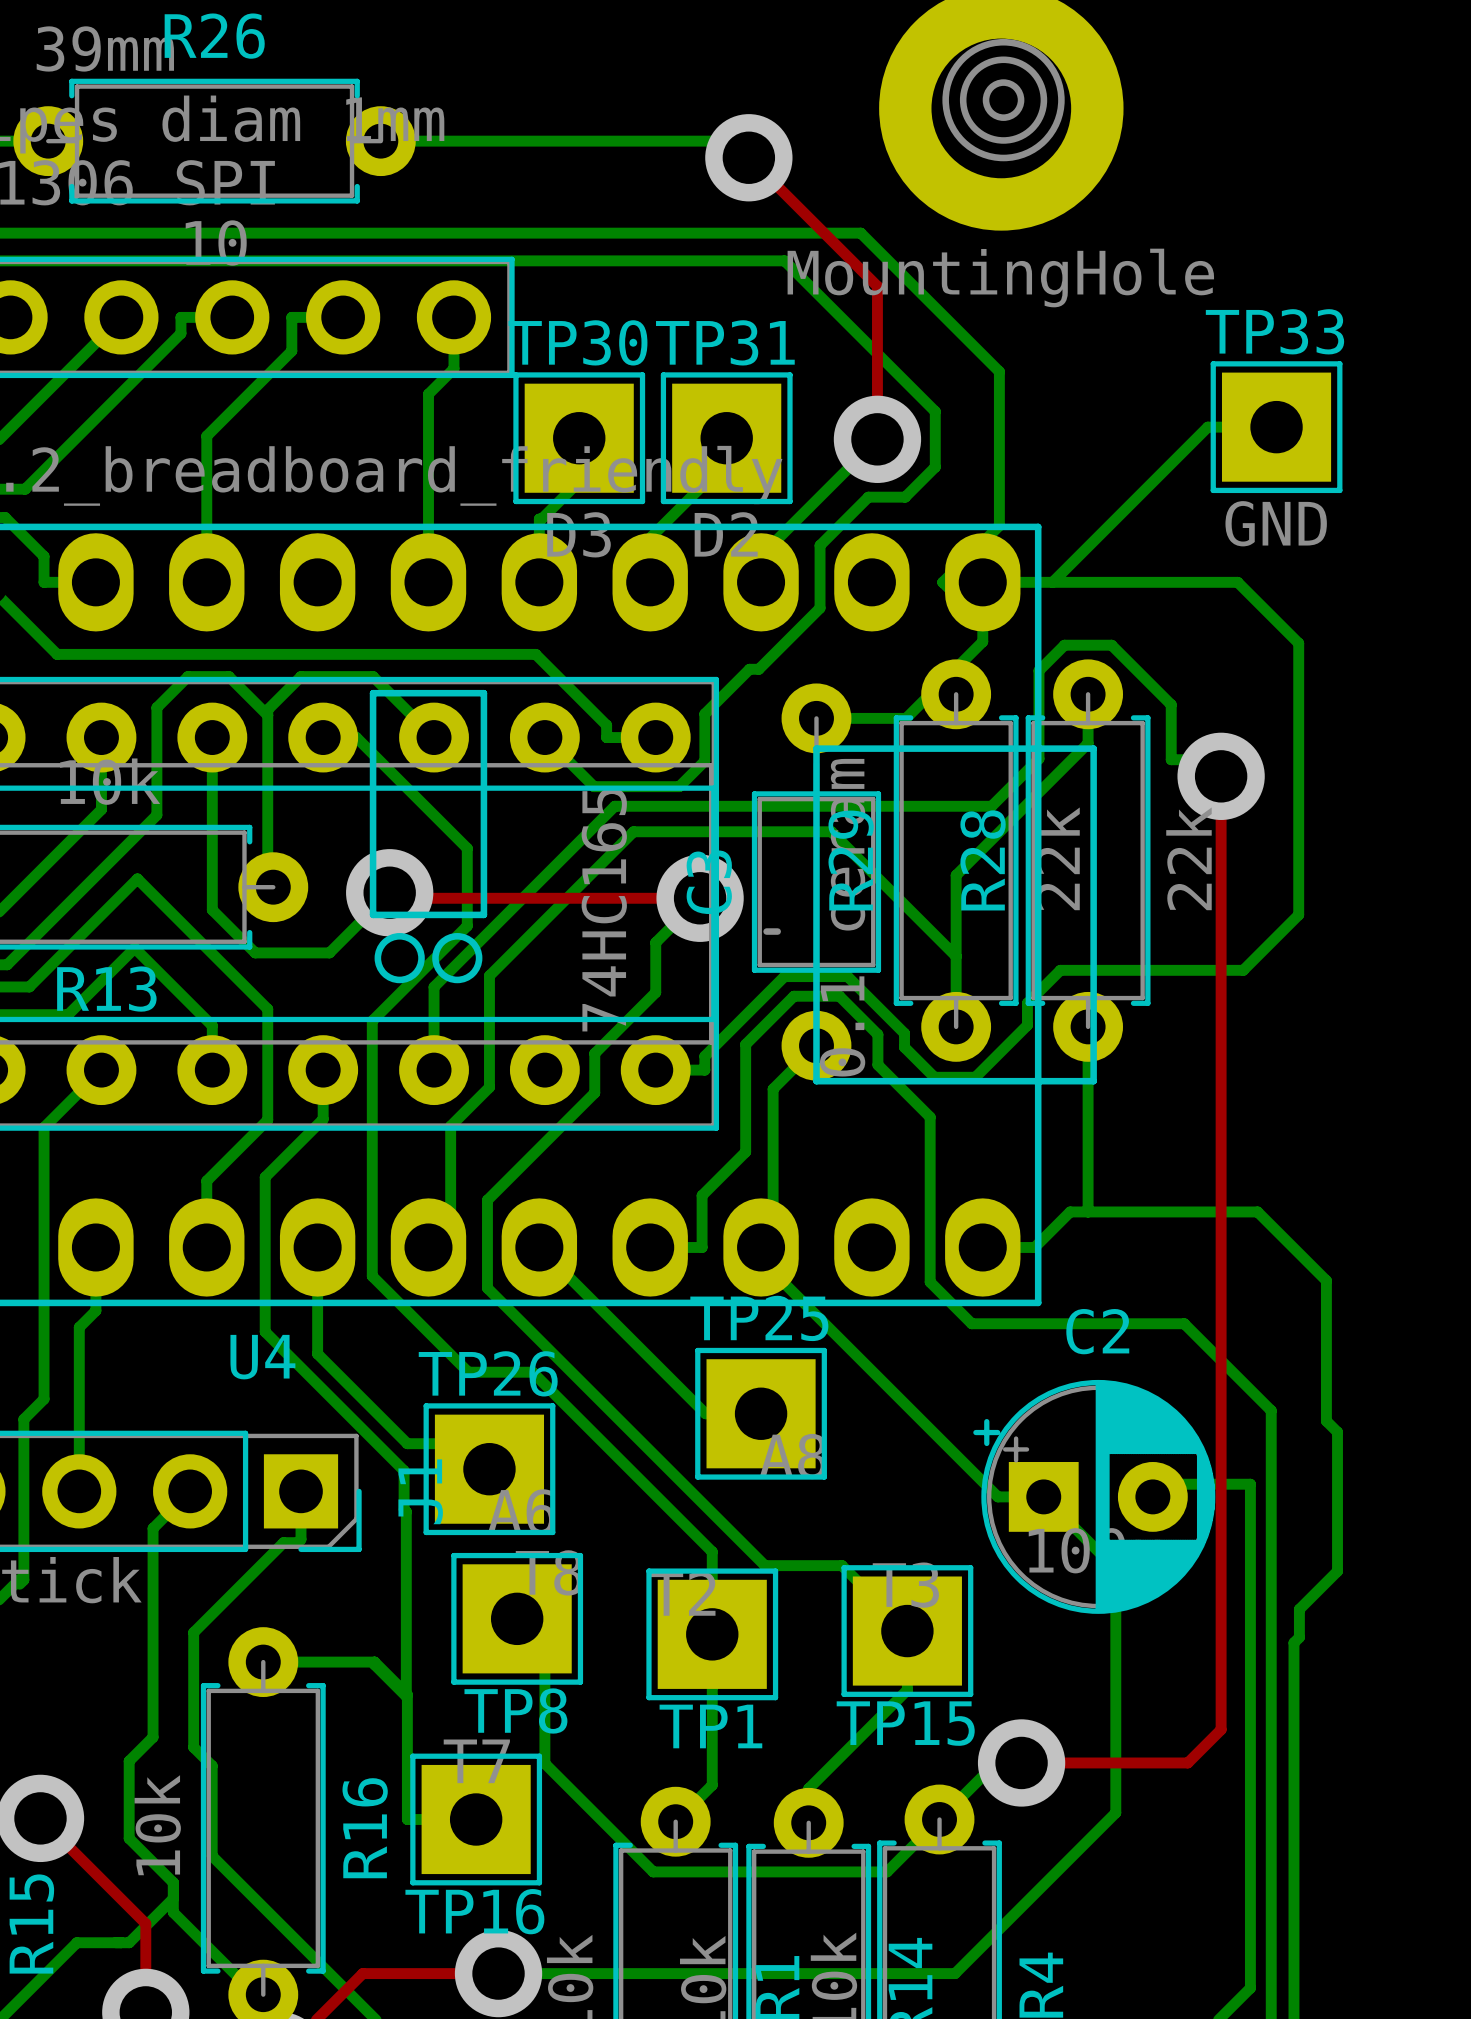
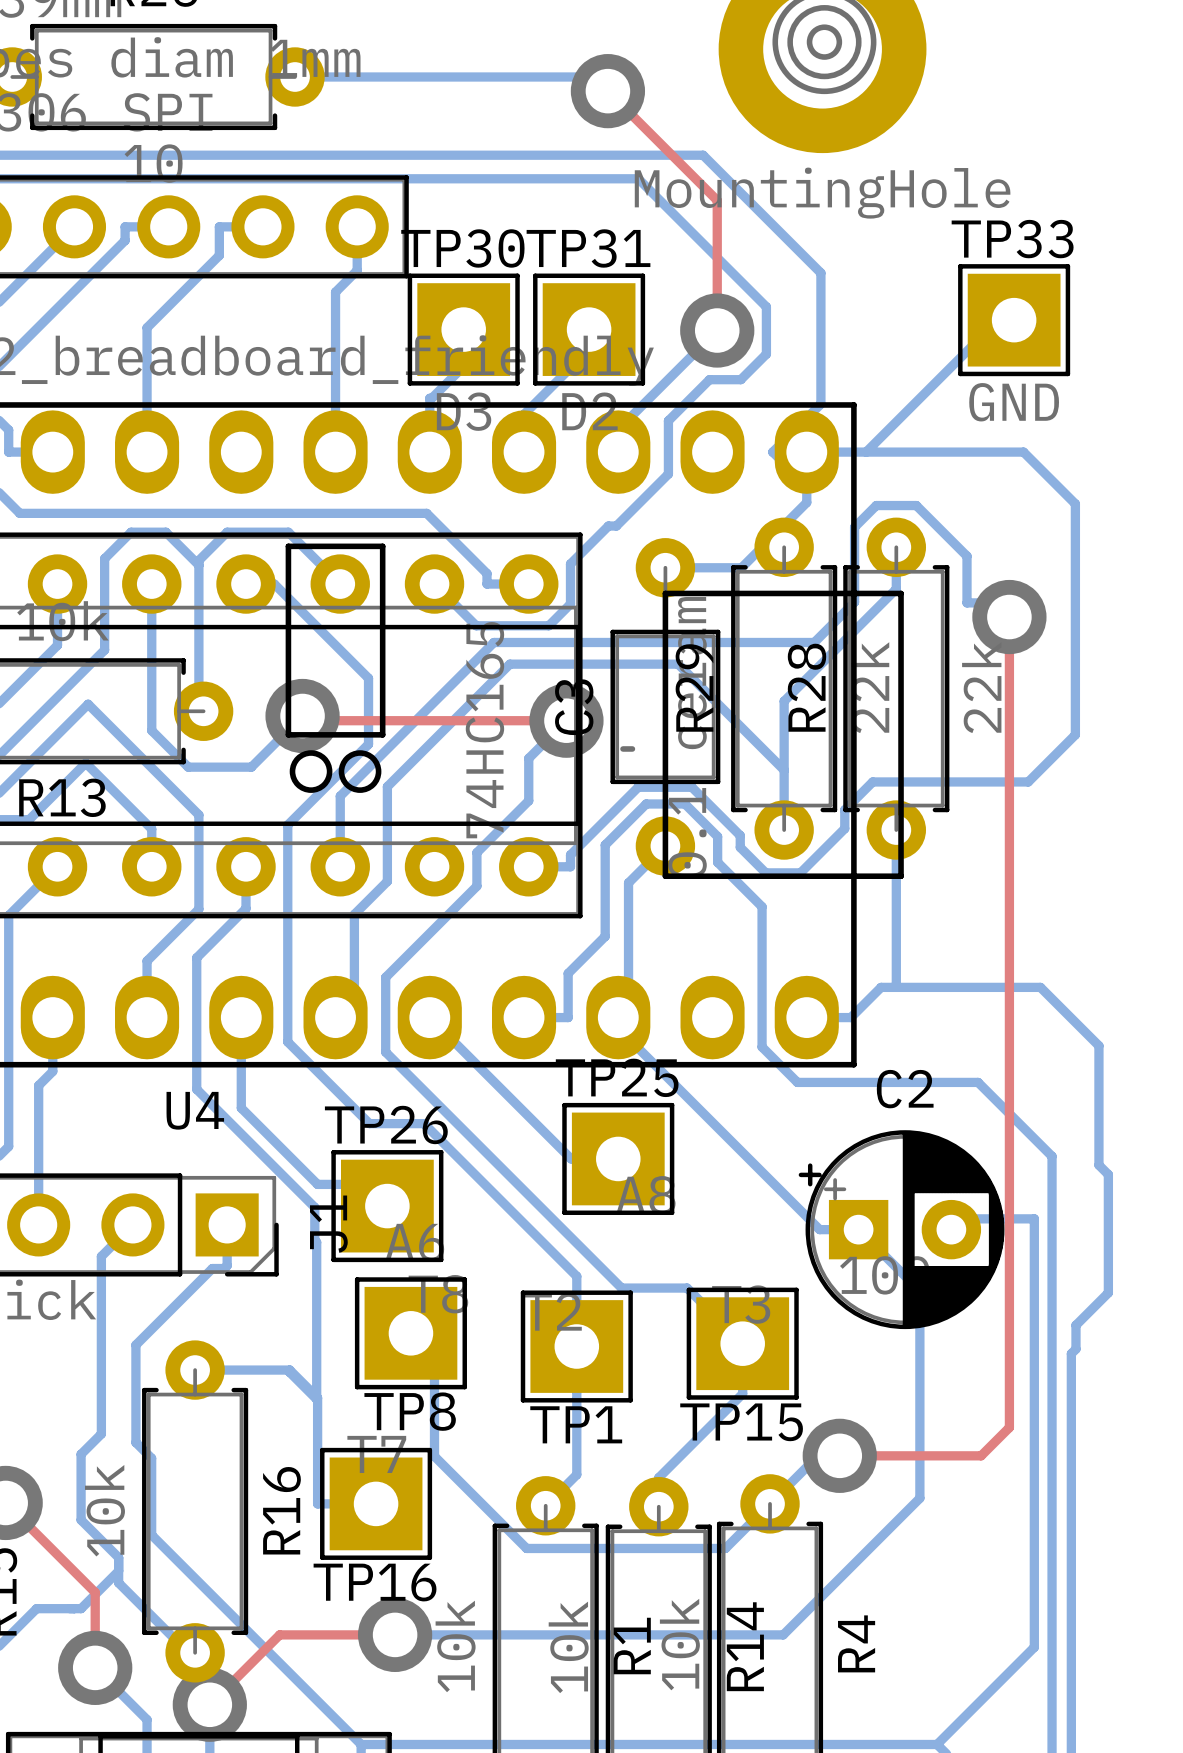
TP33 position: (1276, 427) -> (1014, 320)

